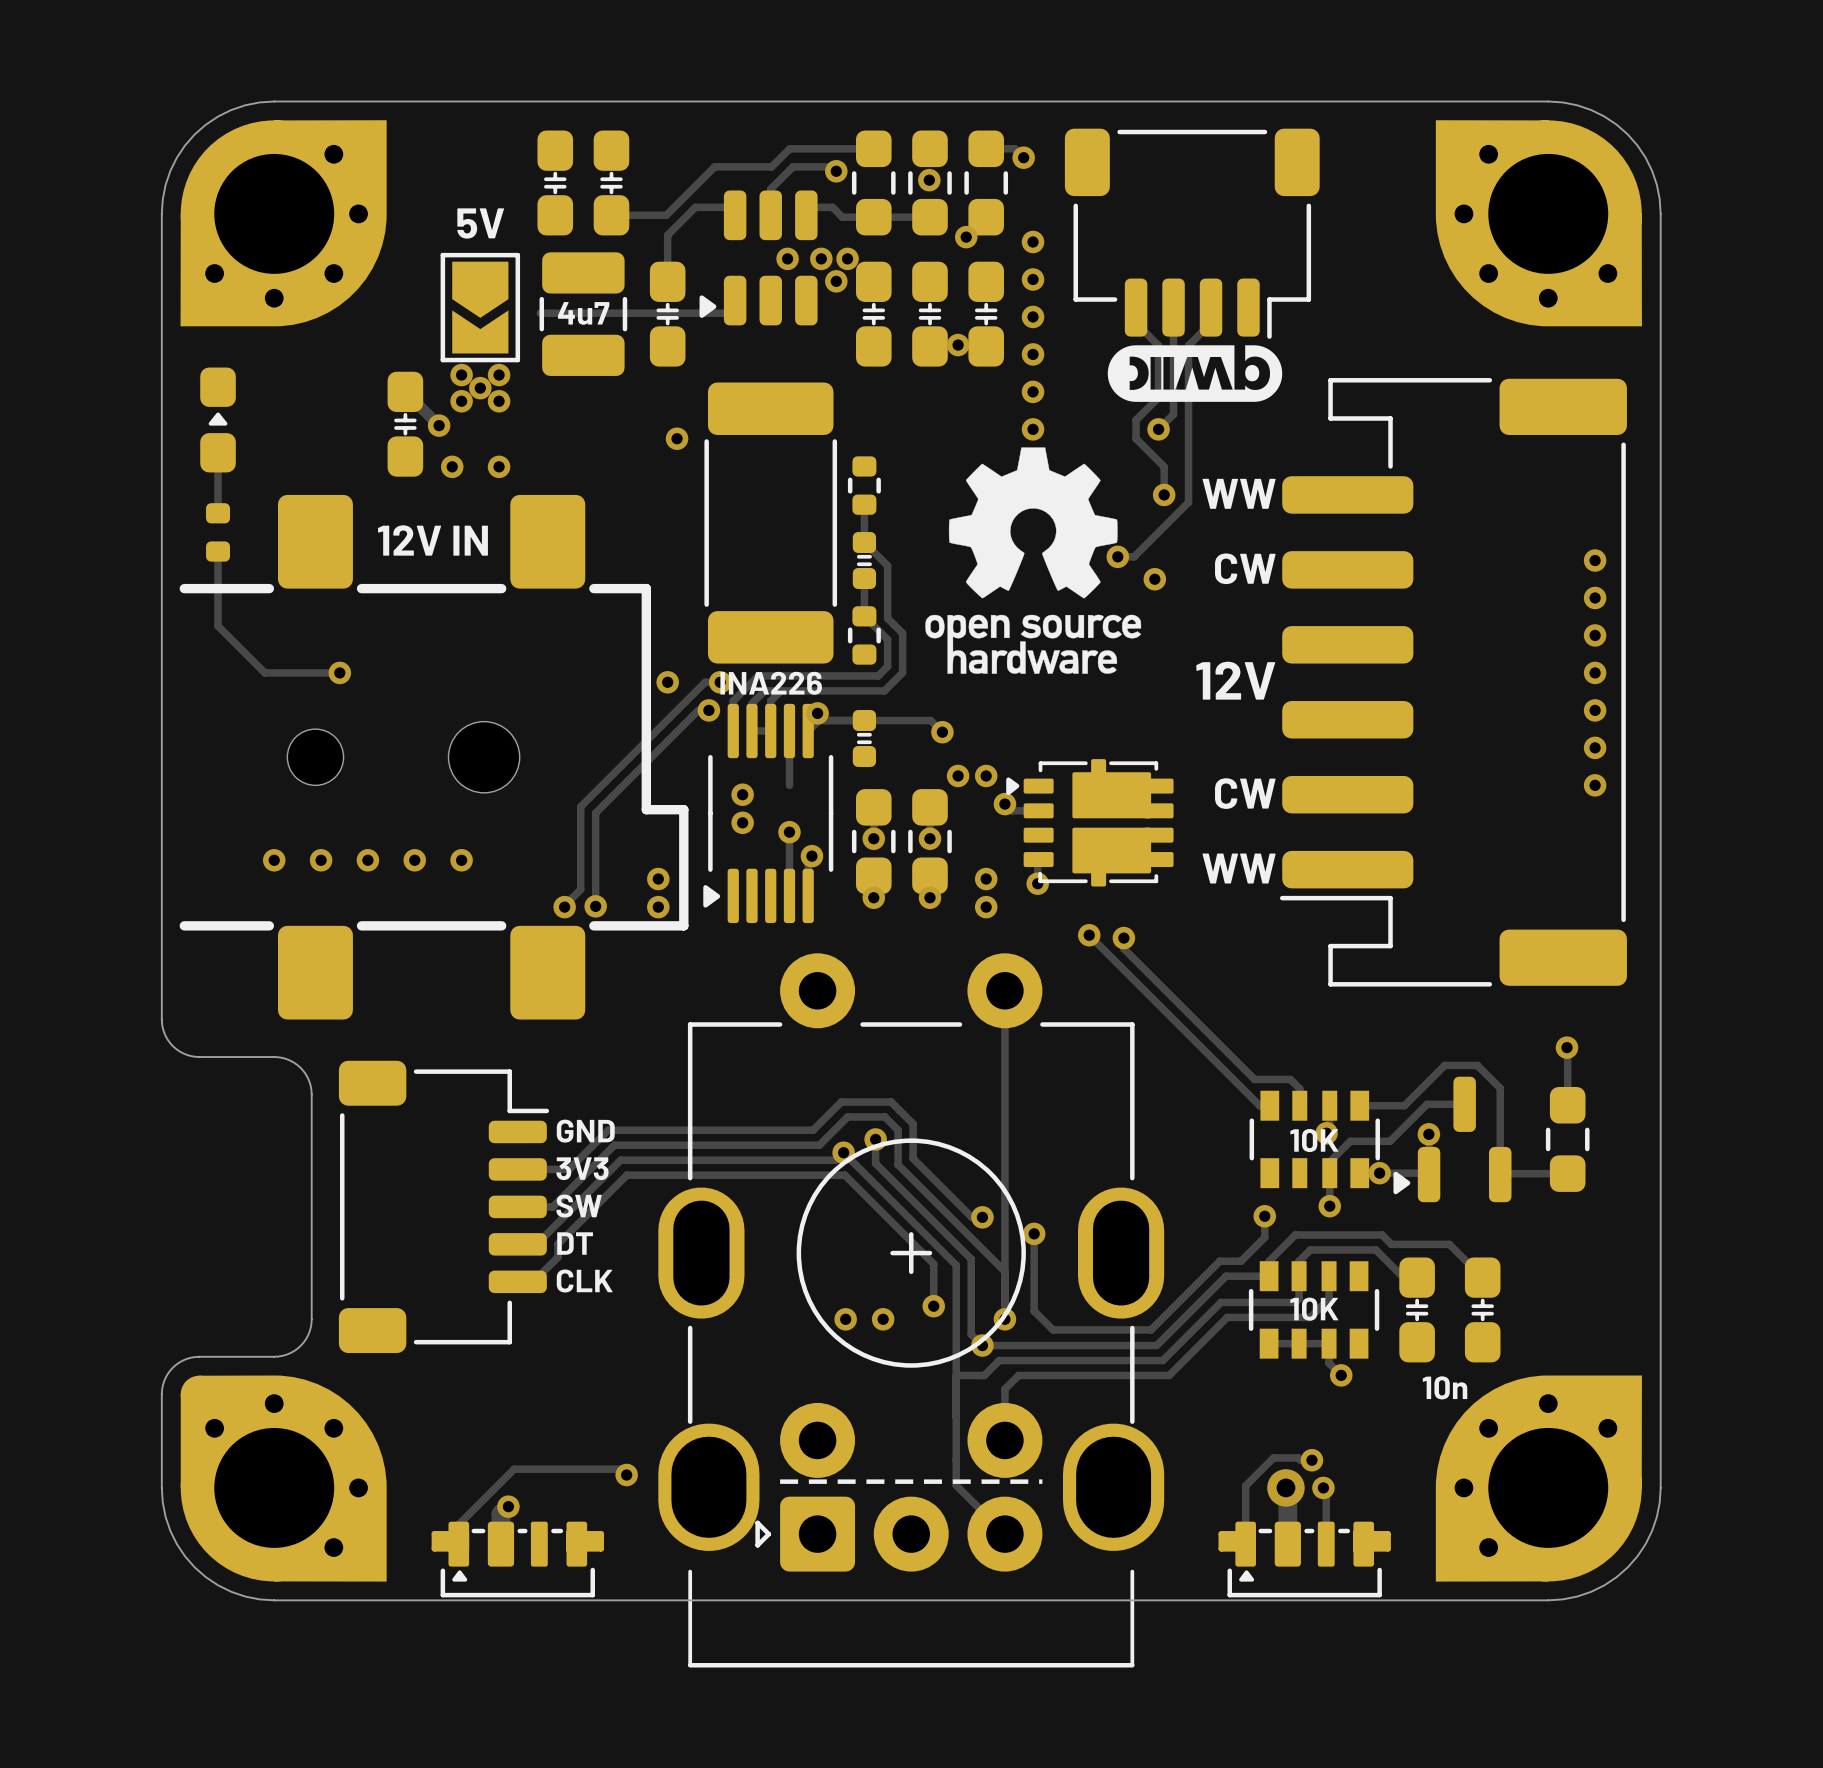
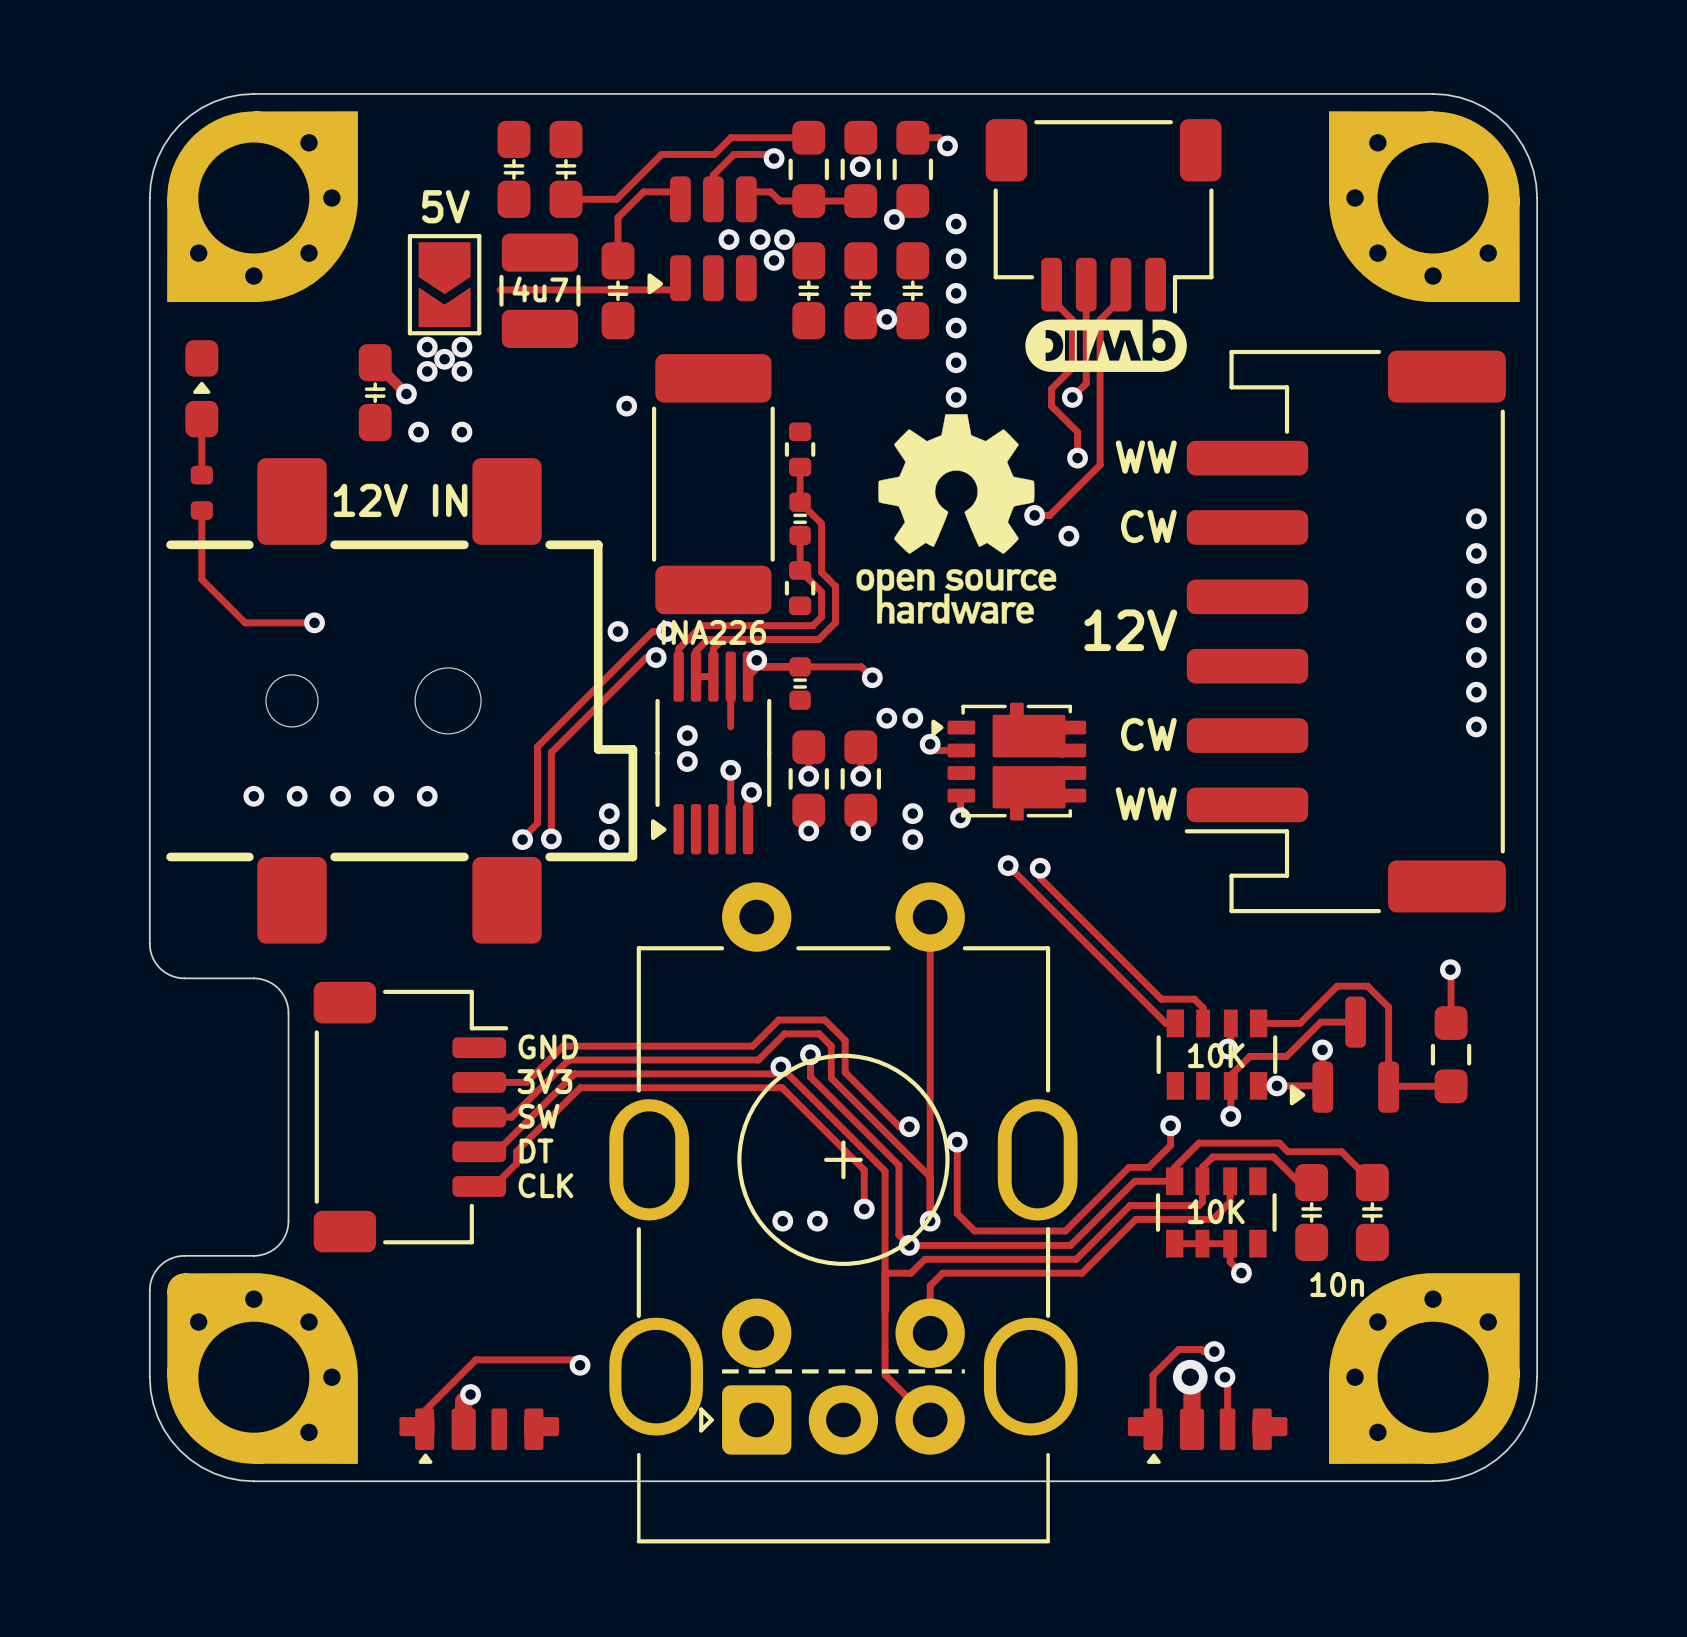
part footprint: [431, 1521, 604, 1598] -> [399, 1408, 560, 1464]
part footprint: [1218, 1521, 1391, 1598] -> [1127, 1408, 1288, 1464]

